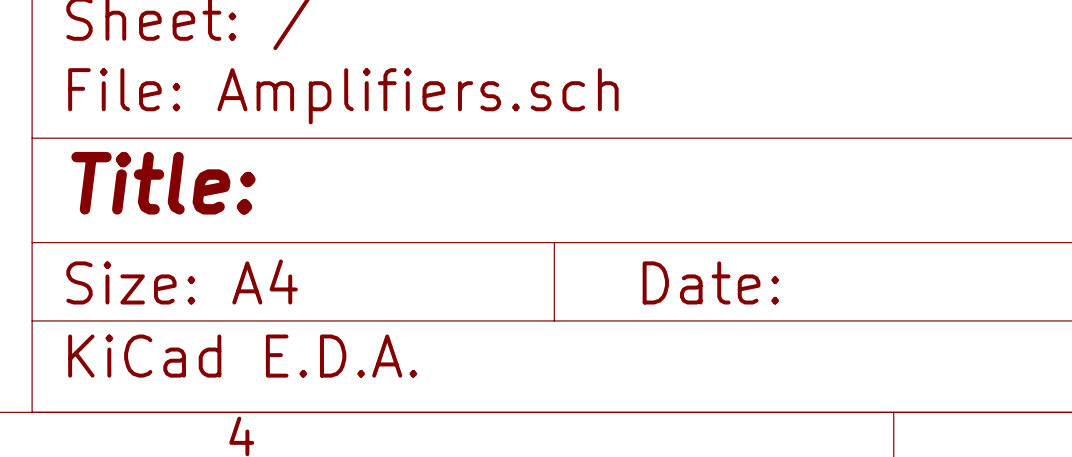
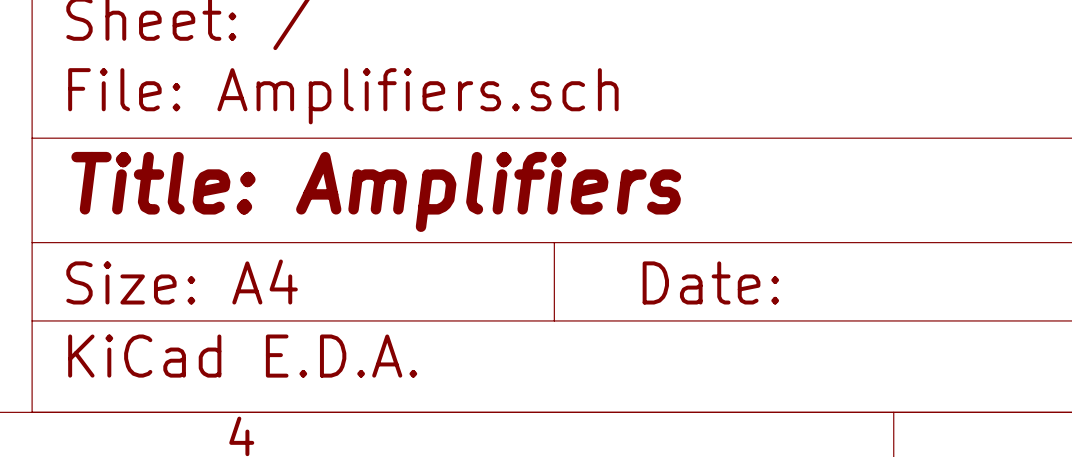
title block: Title: (163, 183) -> Title: Amplifiers (376, 191)

